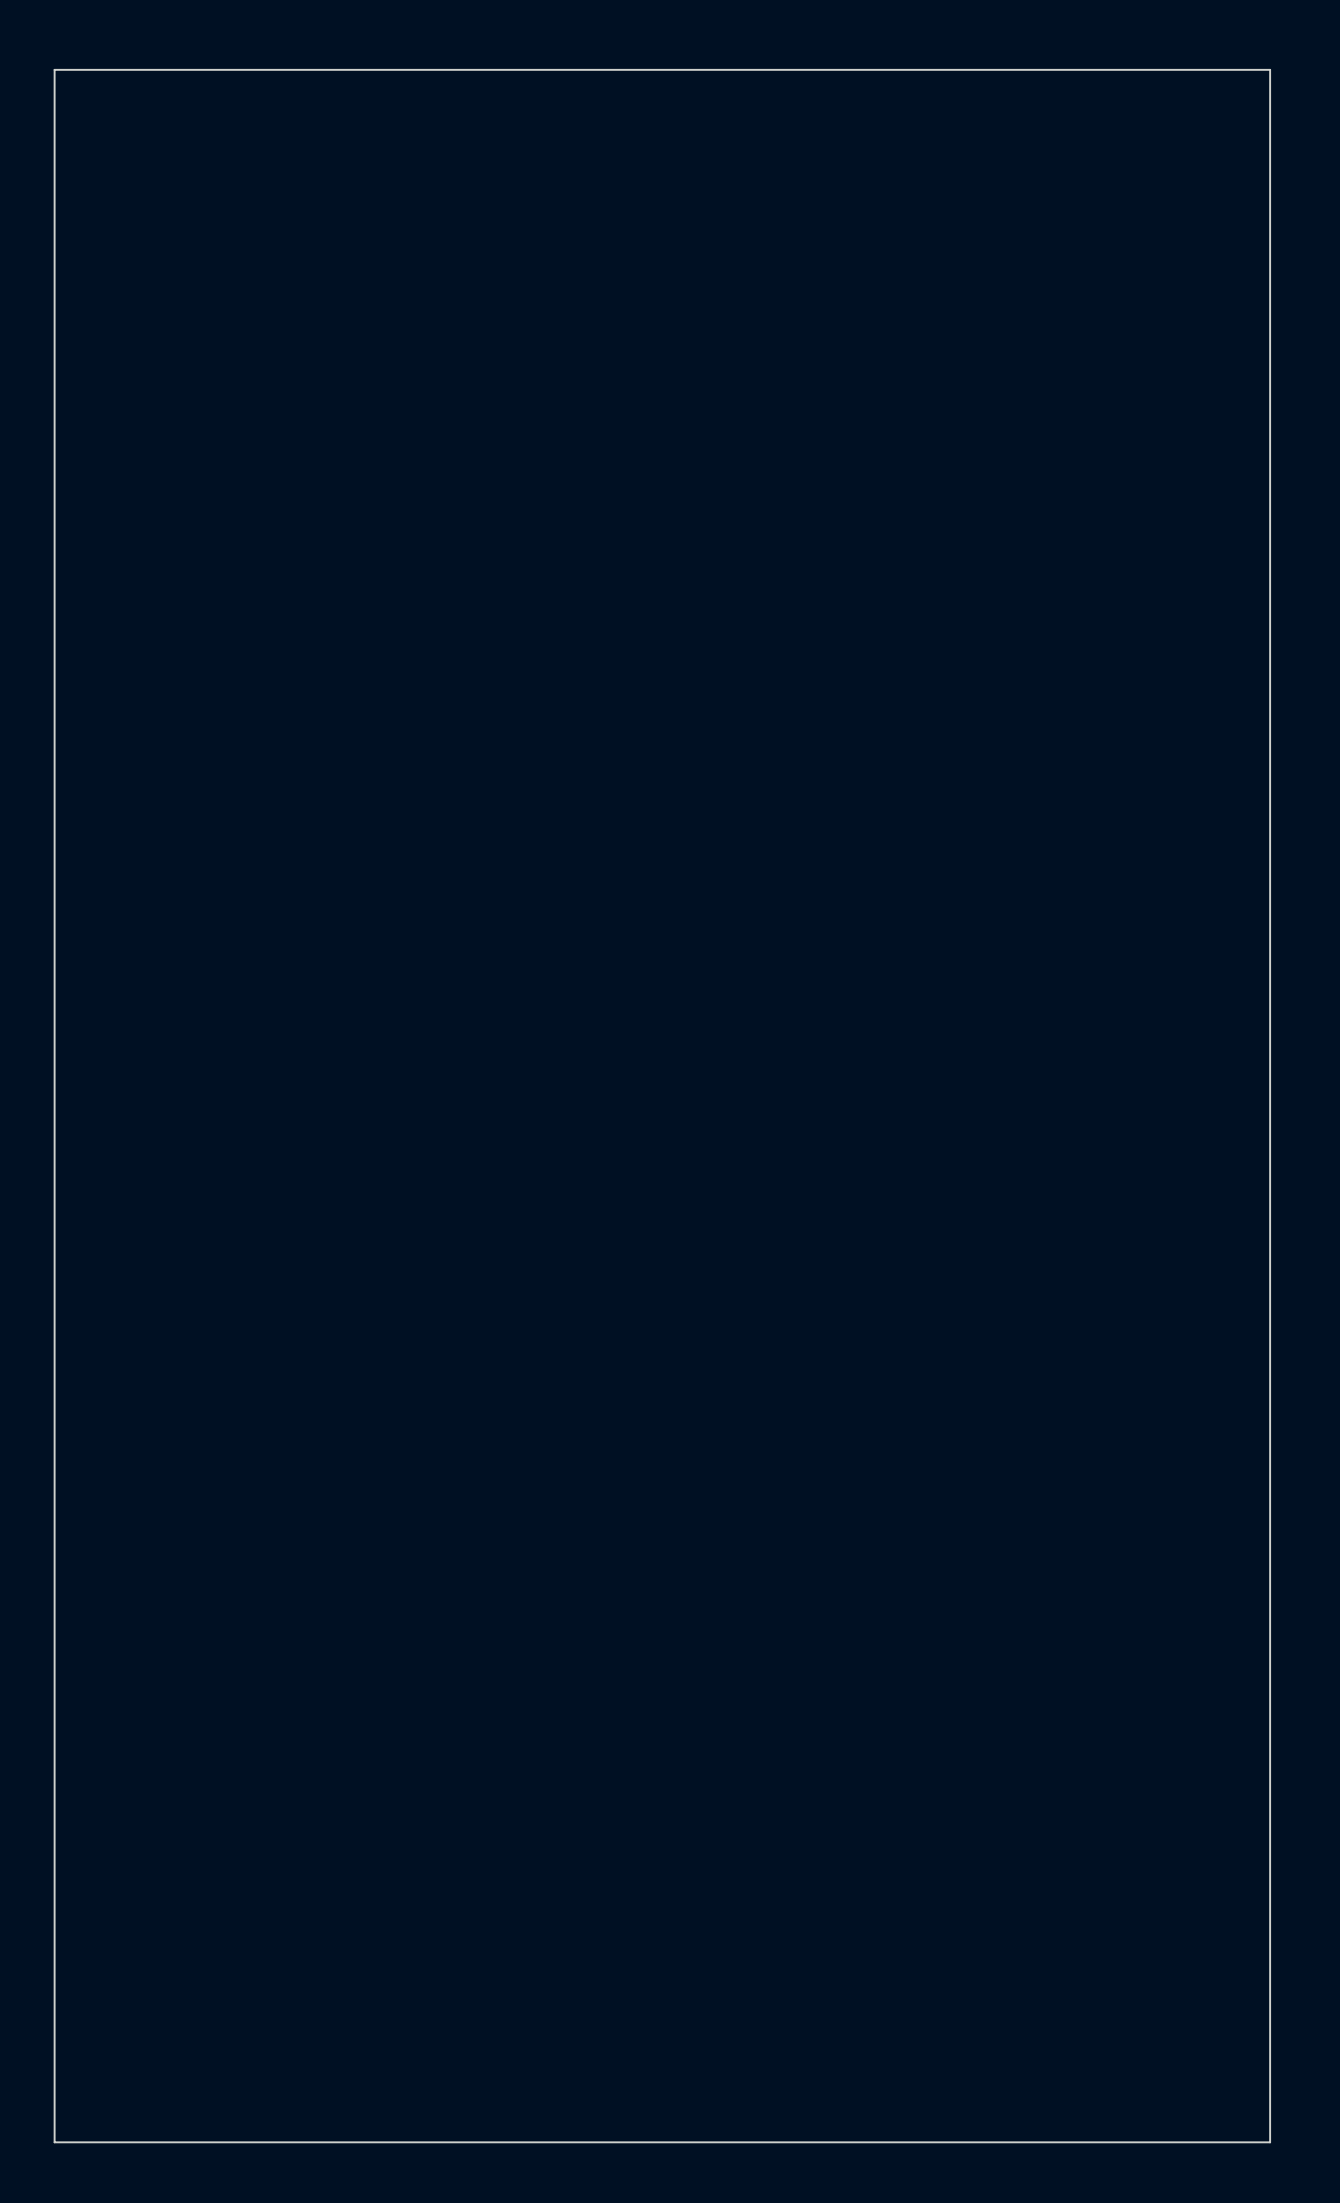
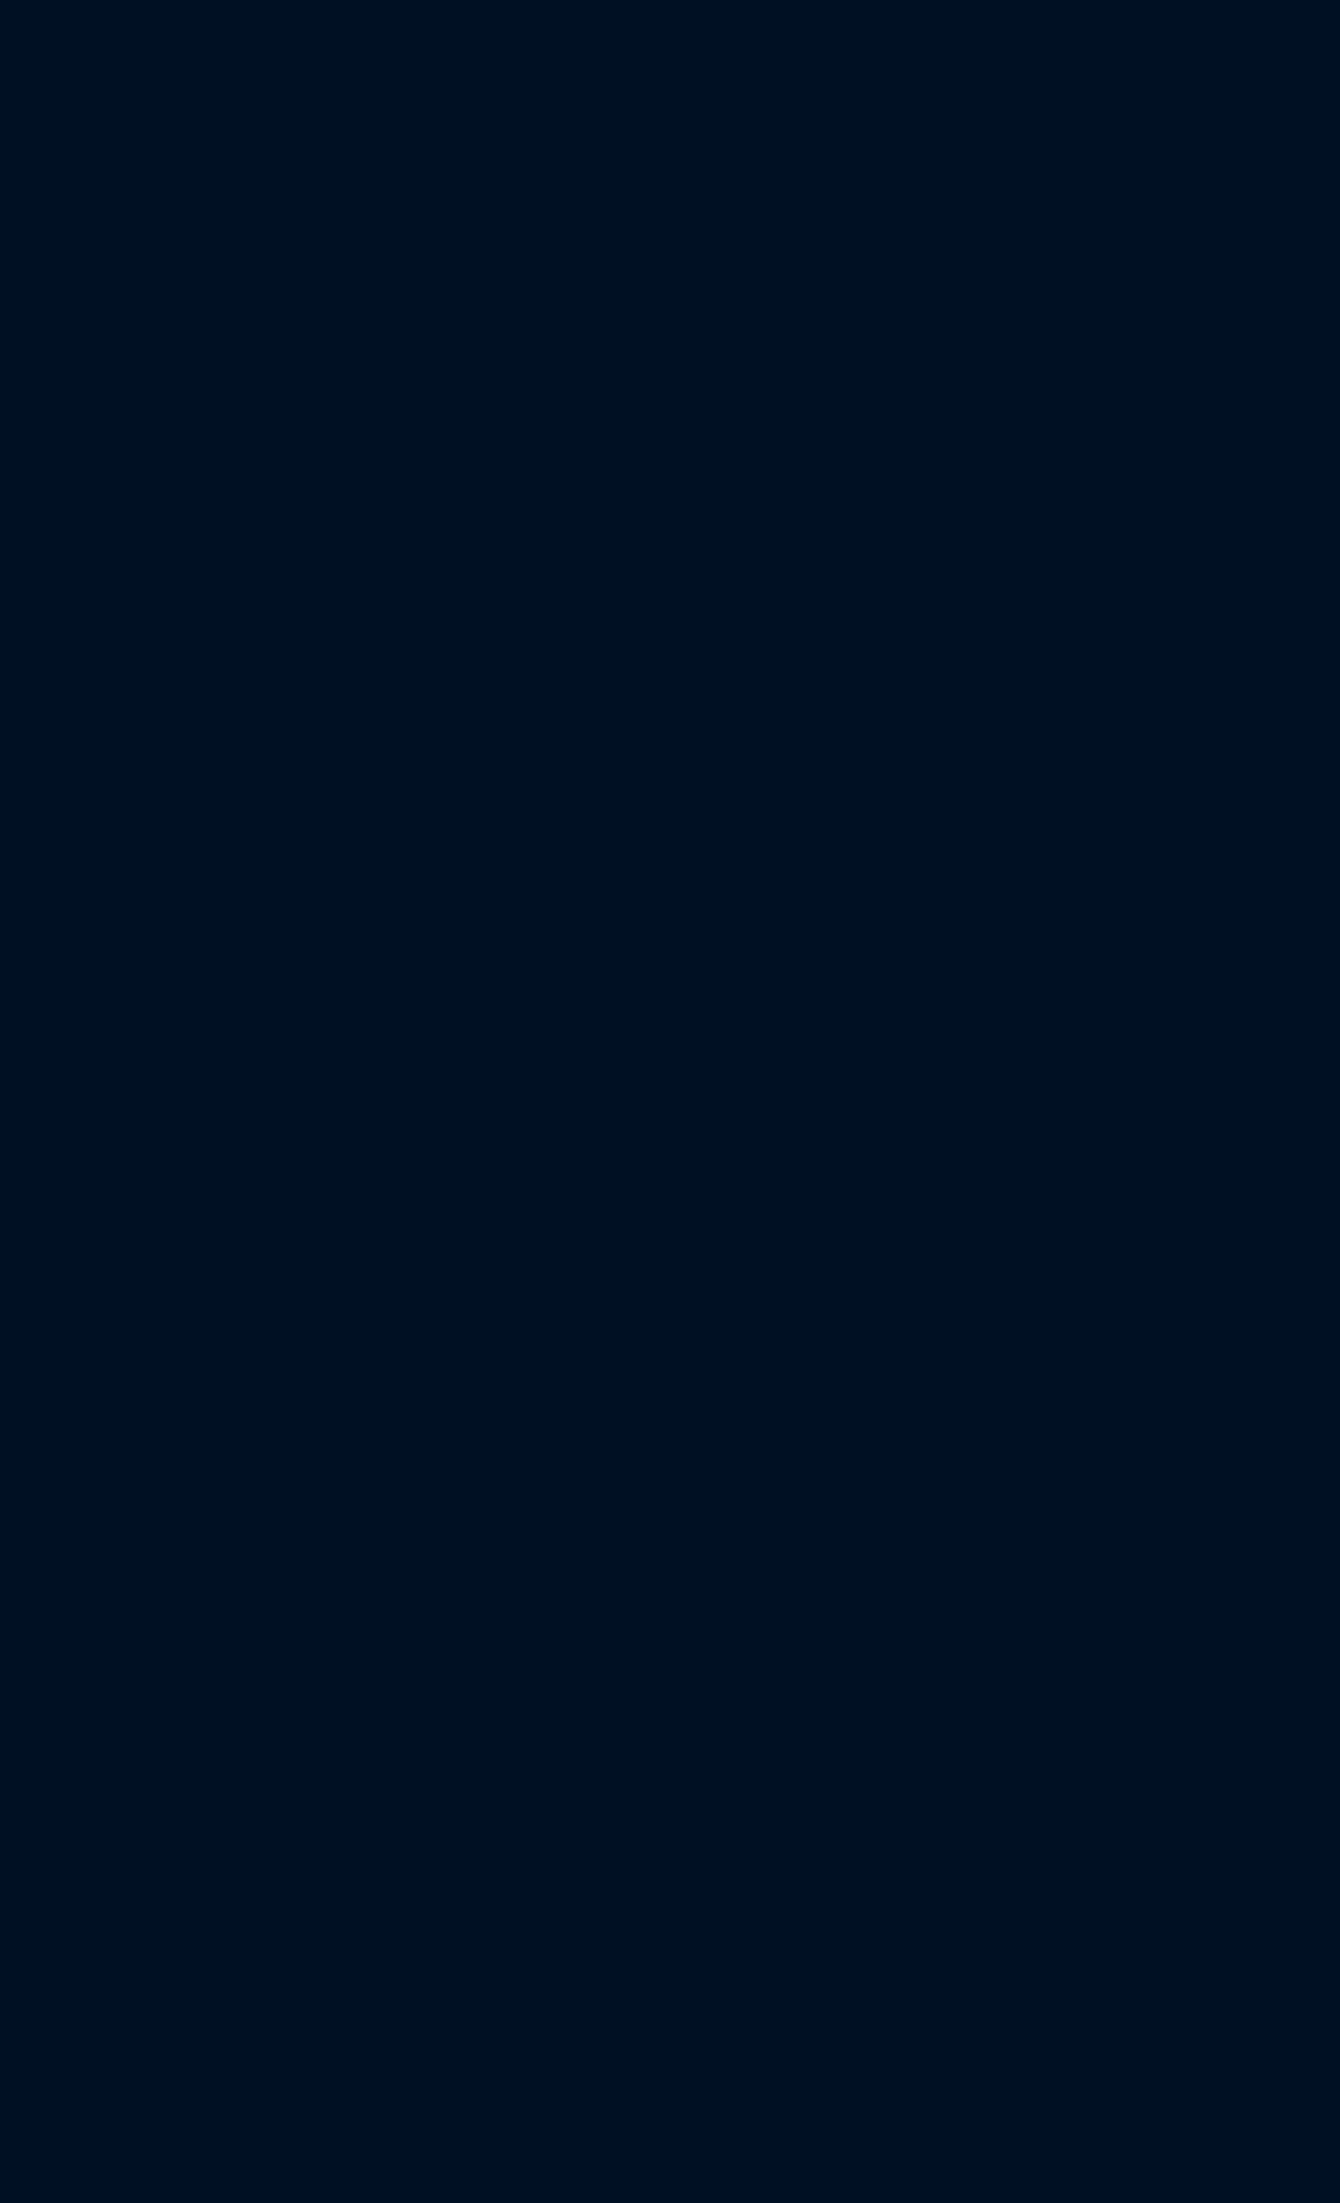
board edge: (1270, 69) (54, 69) (54, 2142) (1270, 2142) (1270, 69) -> none

